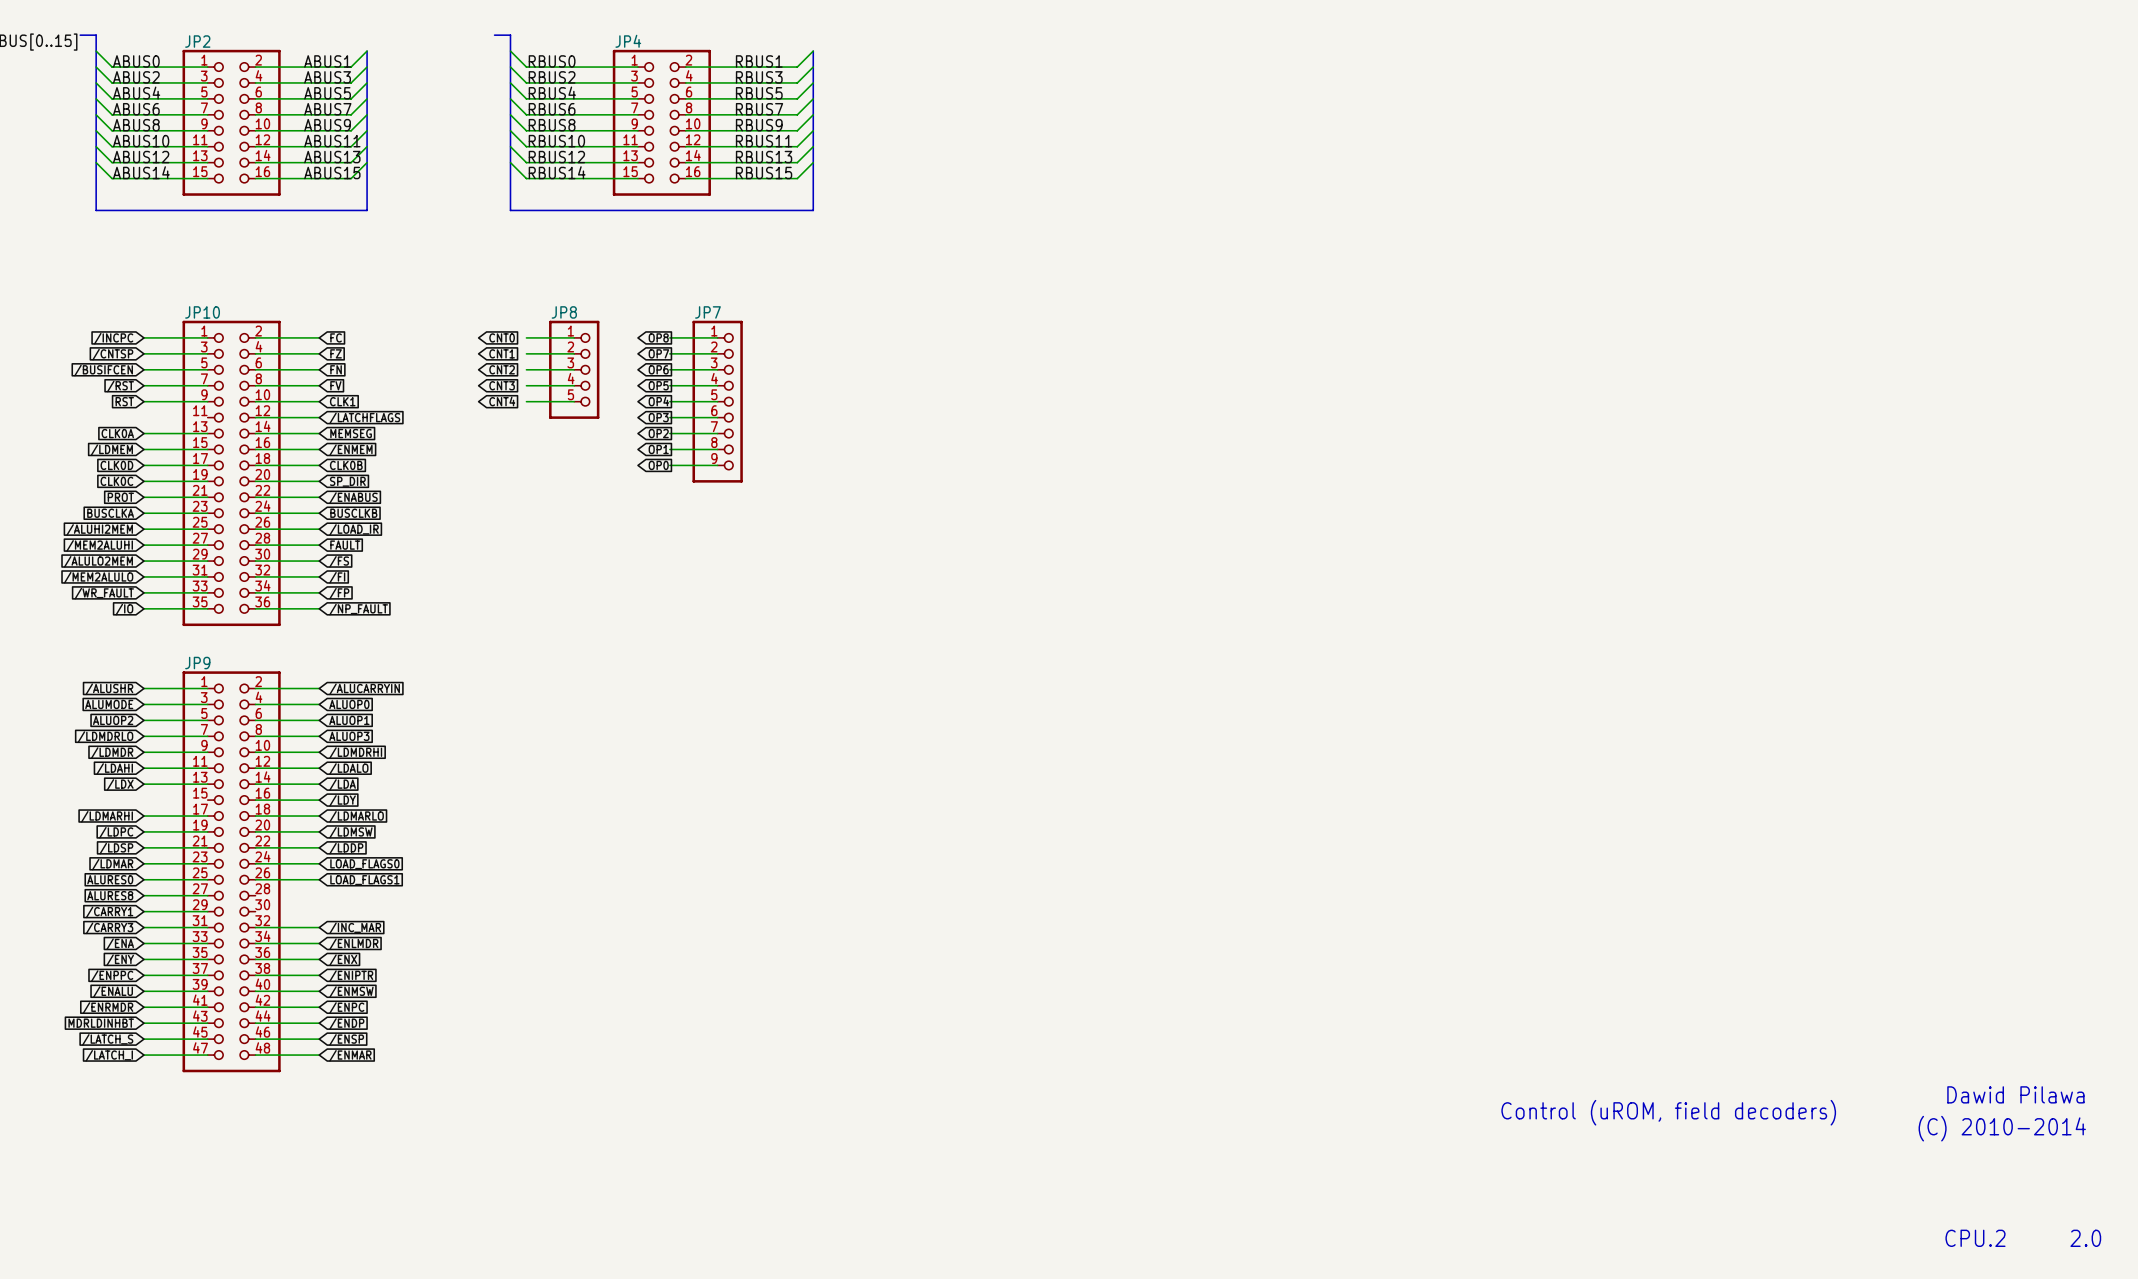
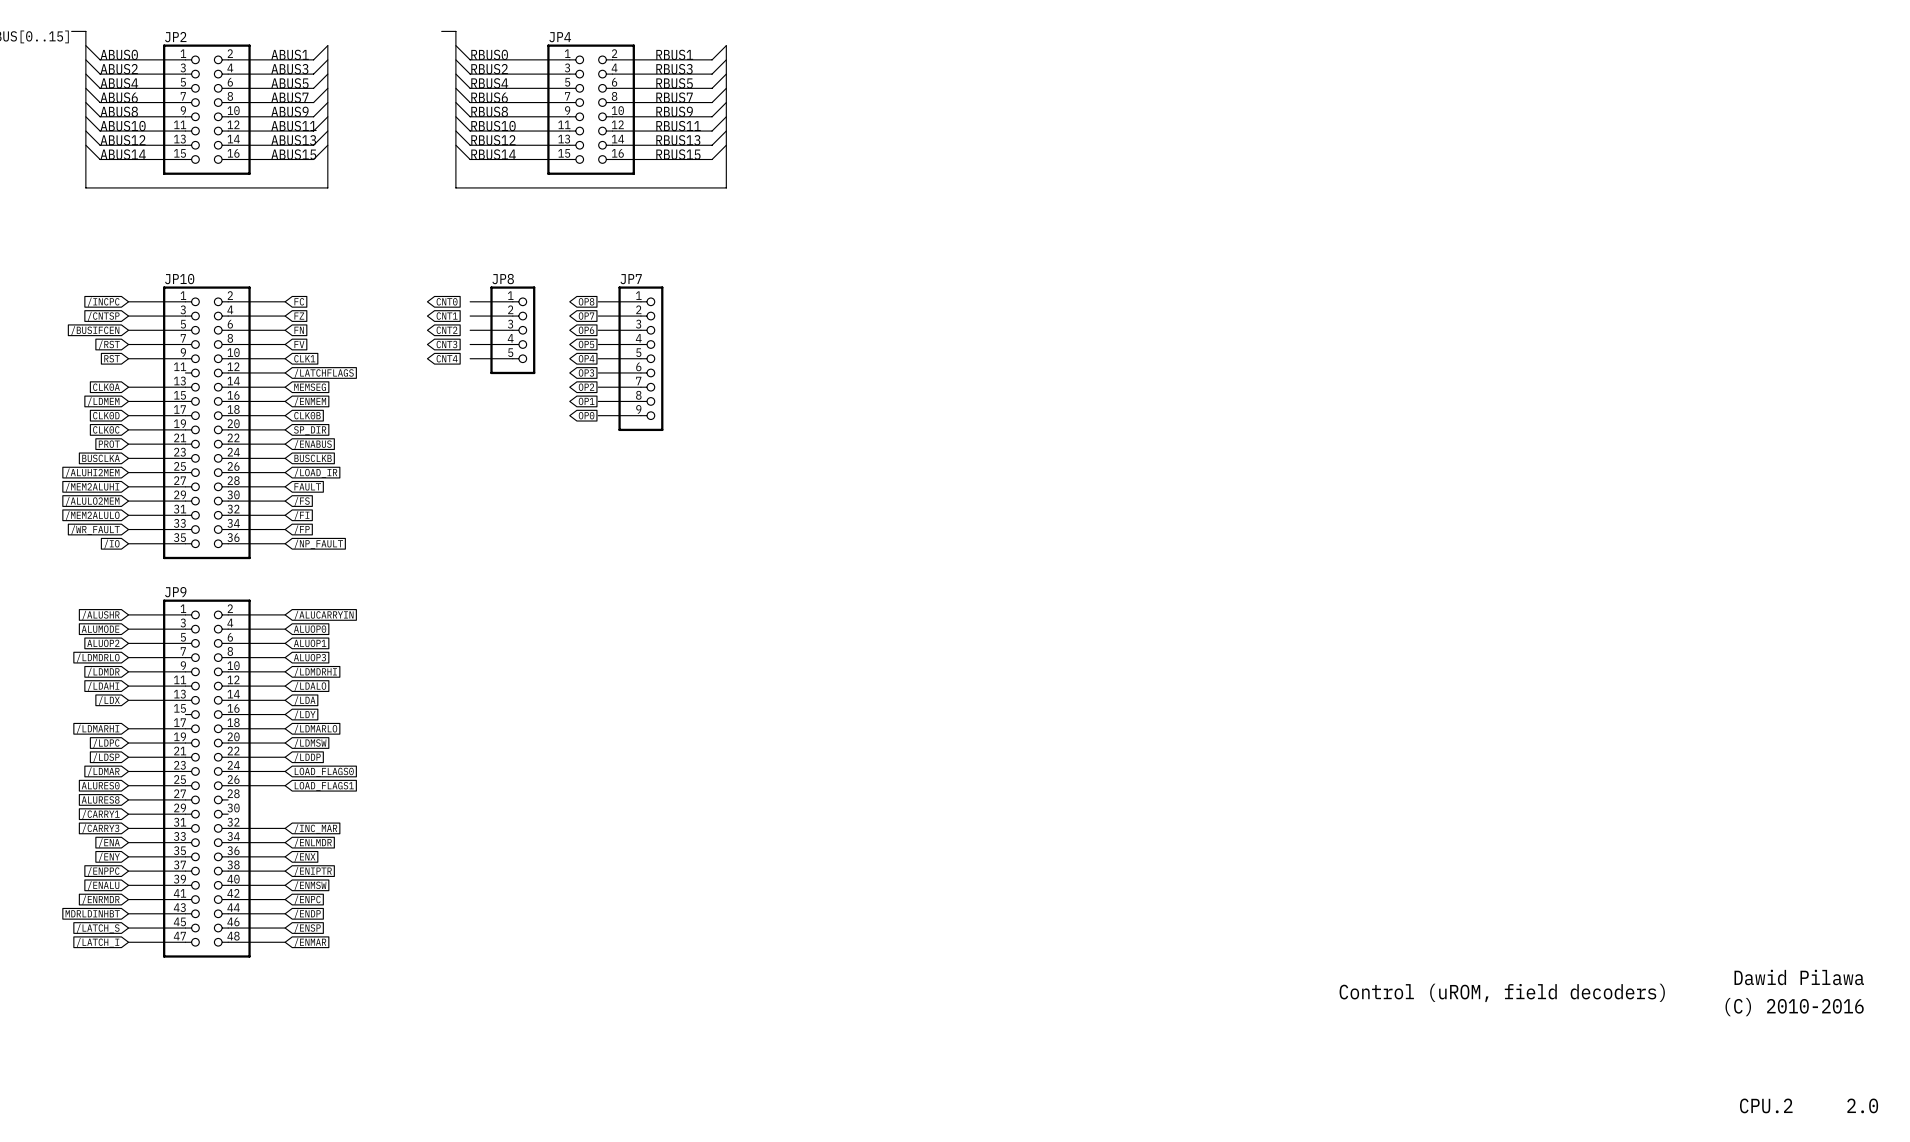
text: (C) 2010-2014 (2002, 1128) -> (C) 2010-2016 (1794, 1007)

